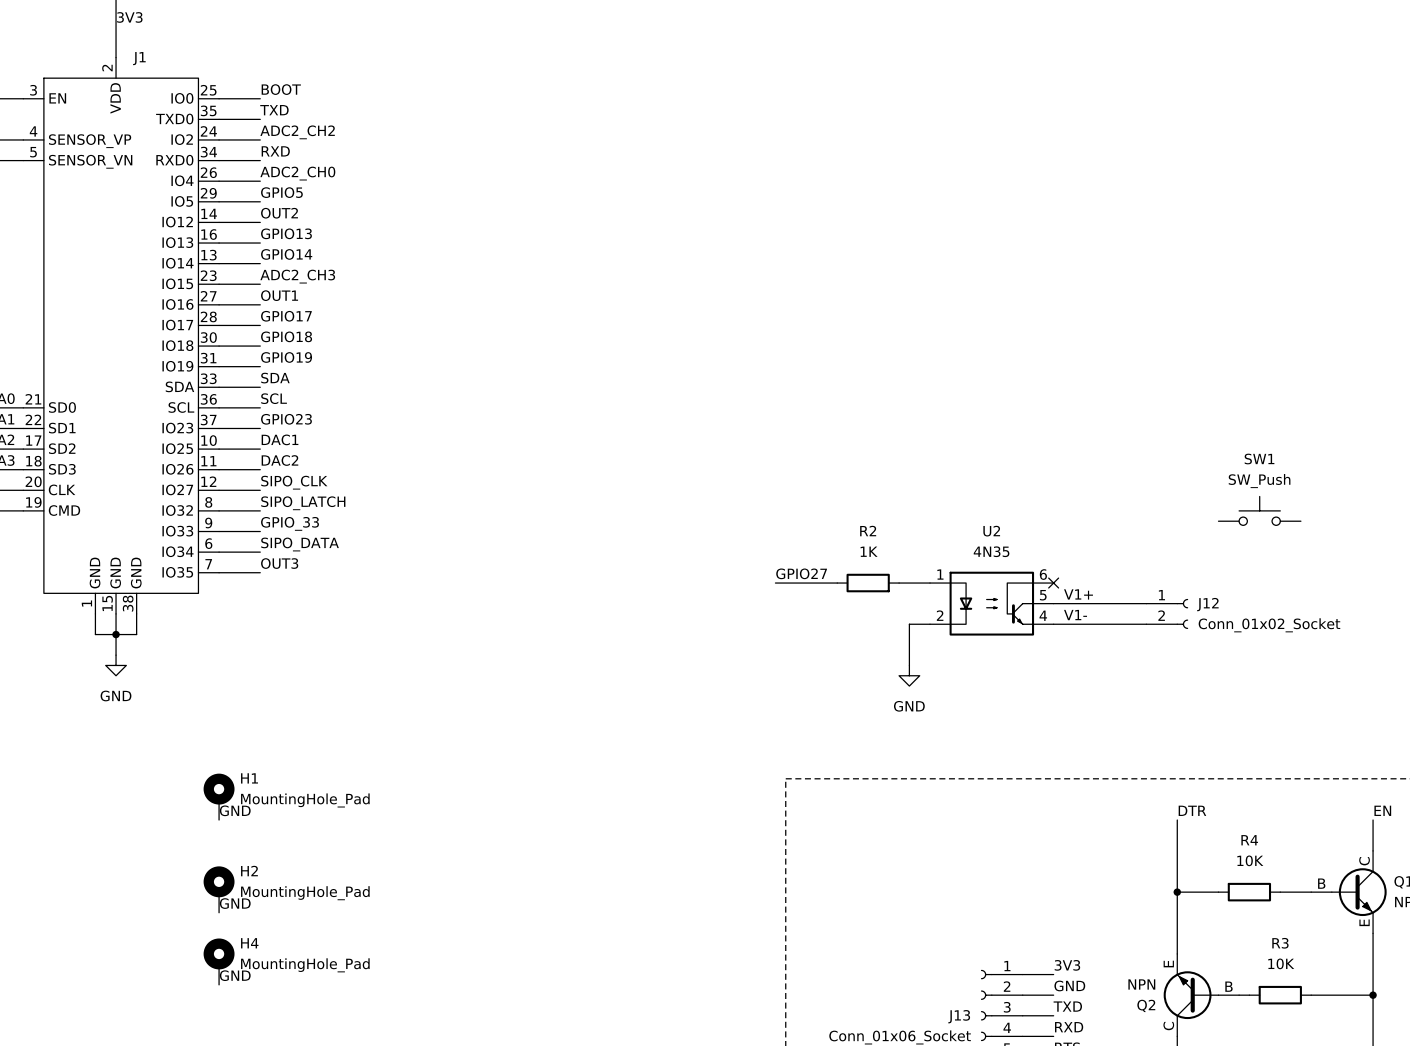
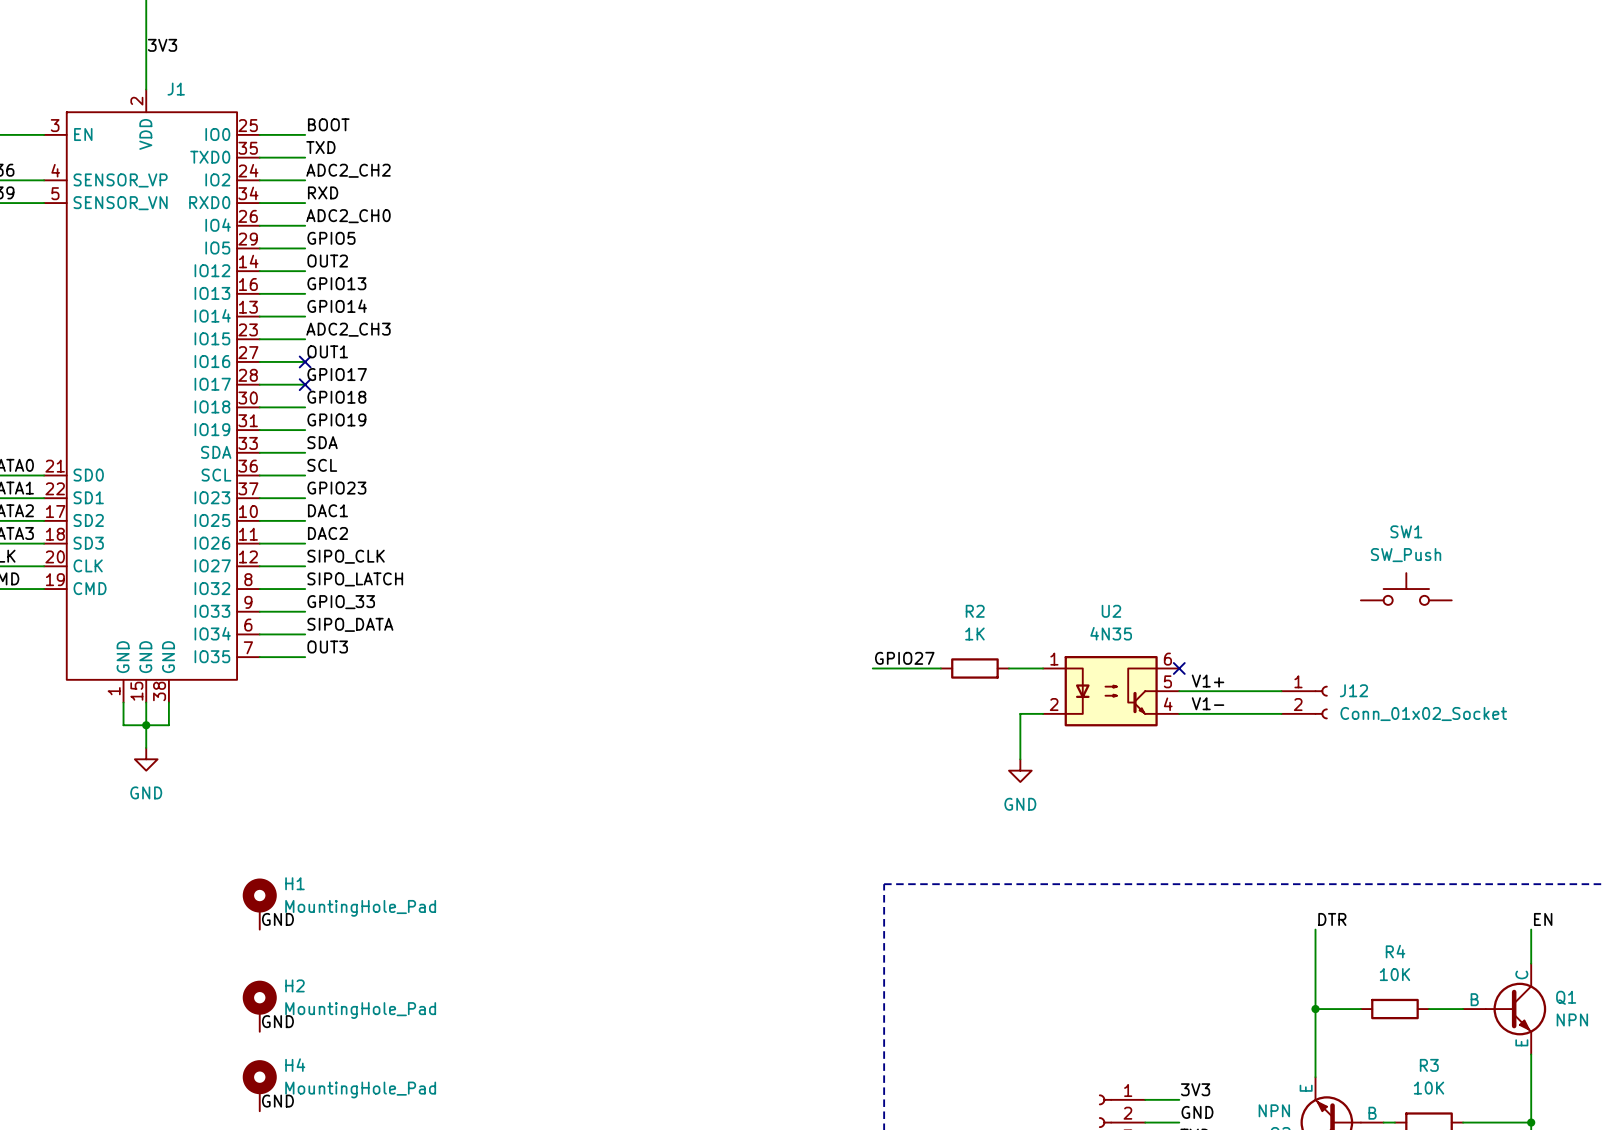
no-connect mark: none -> (305, 361)
no-connect mark: none -> (305, 384)

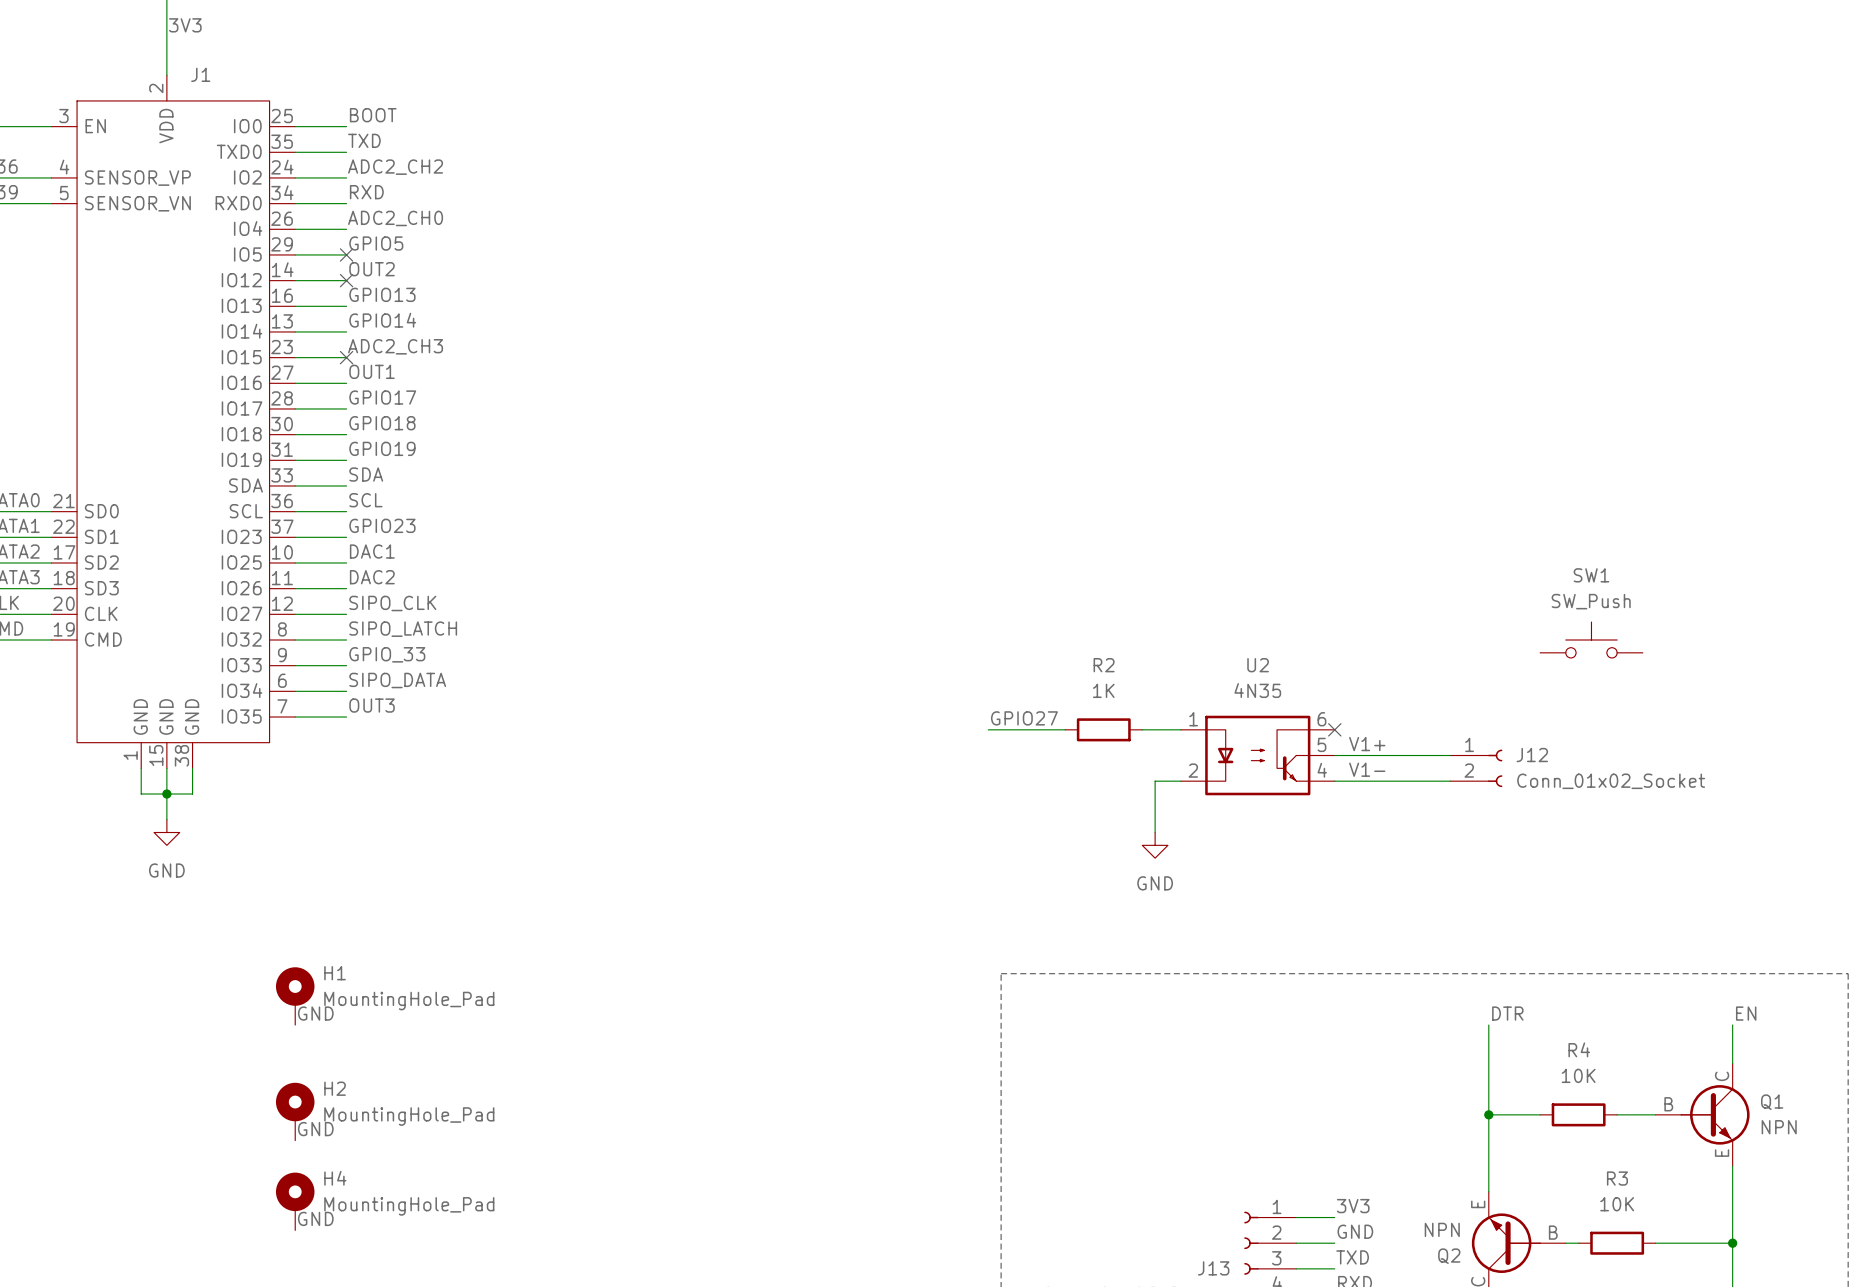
no-connect mark: none -> (346, 254)
no-connect mark: none -> (346, 280)
no-connect mark: none -> (346, 357)
no-connect mark: (305, 361) -> none
no-connect mark: (305, 384) -> none

